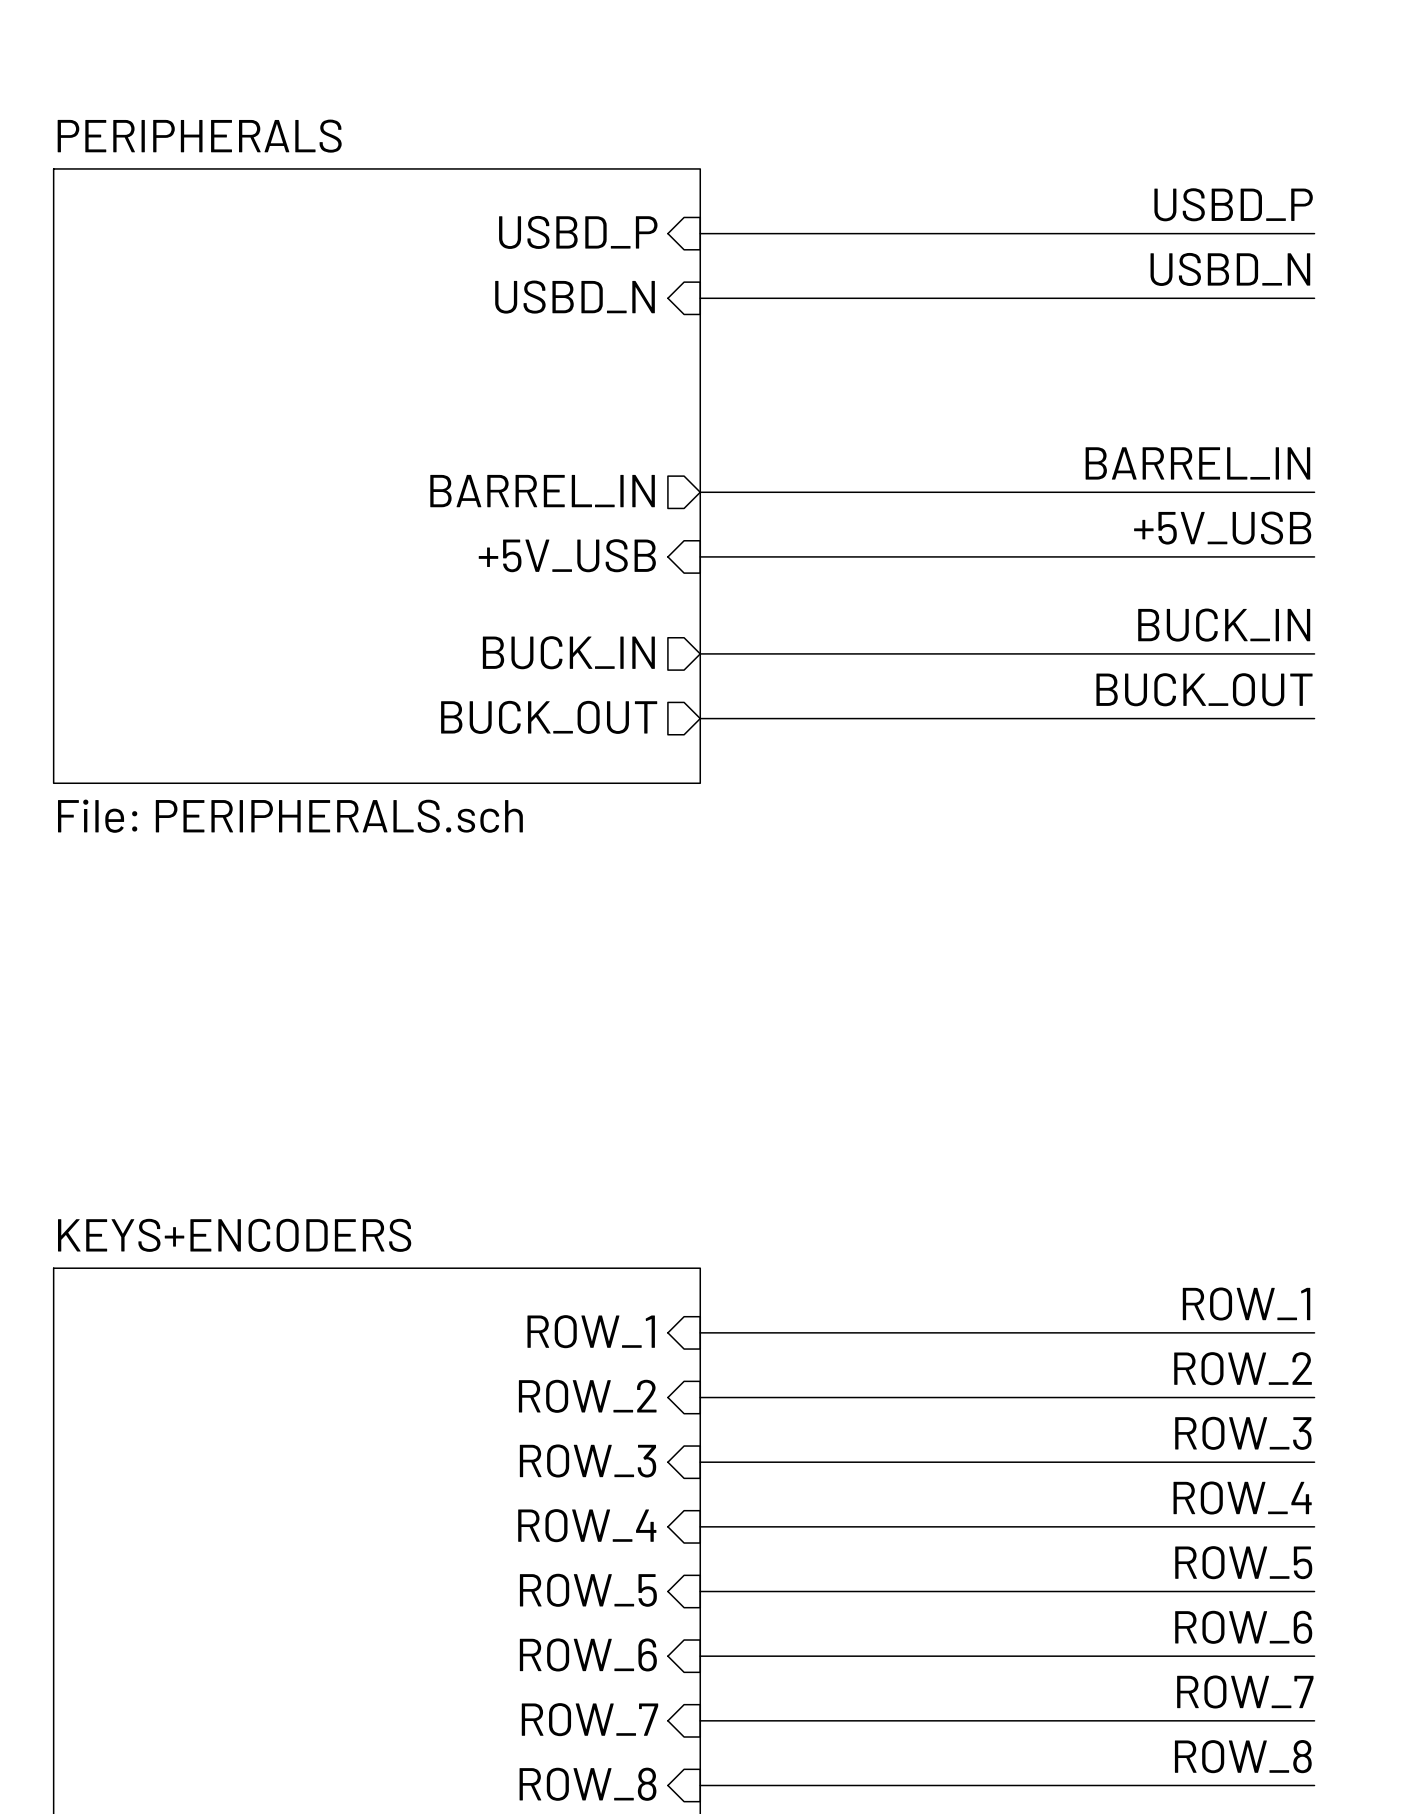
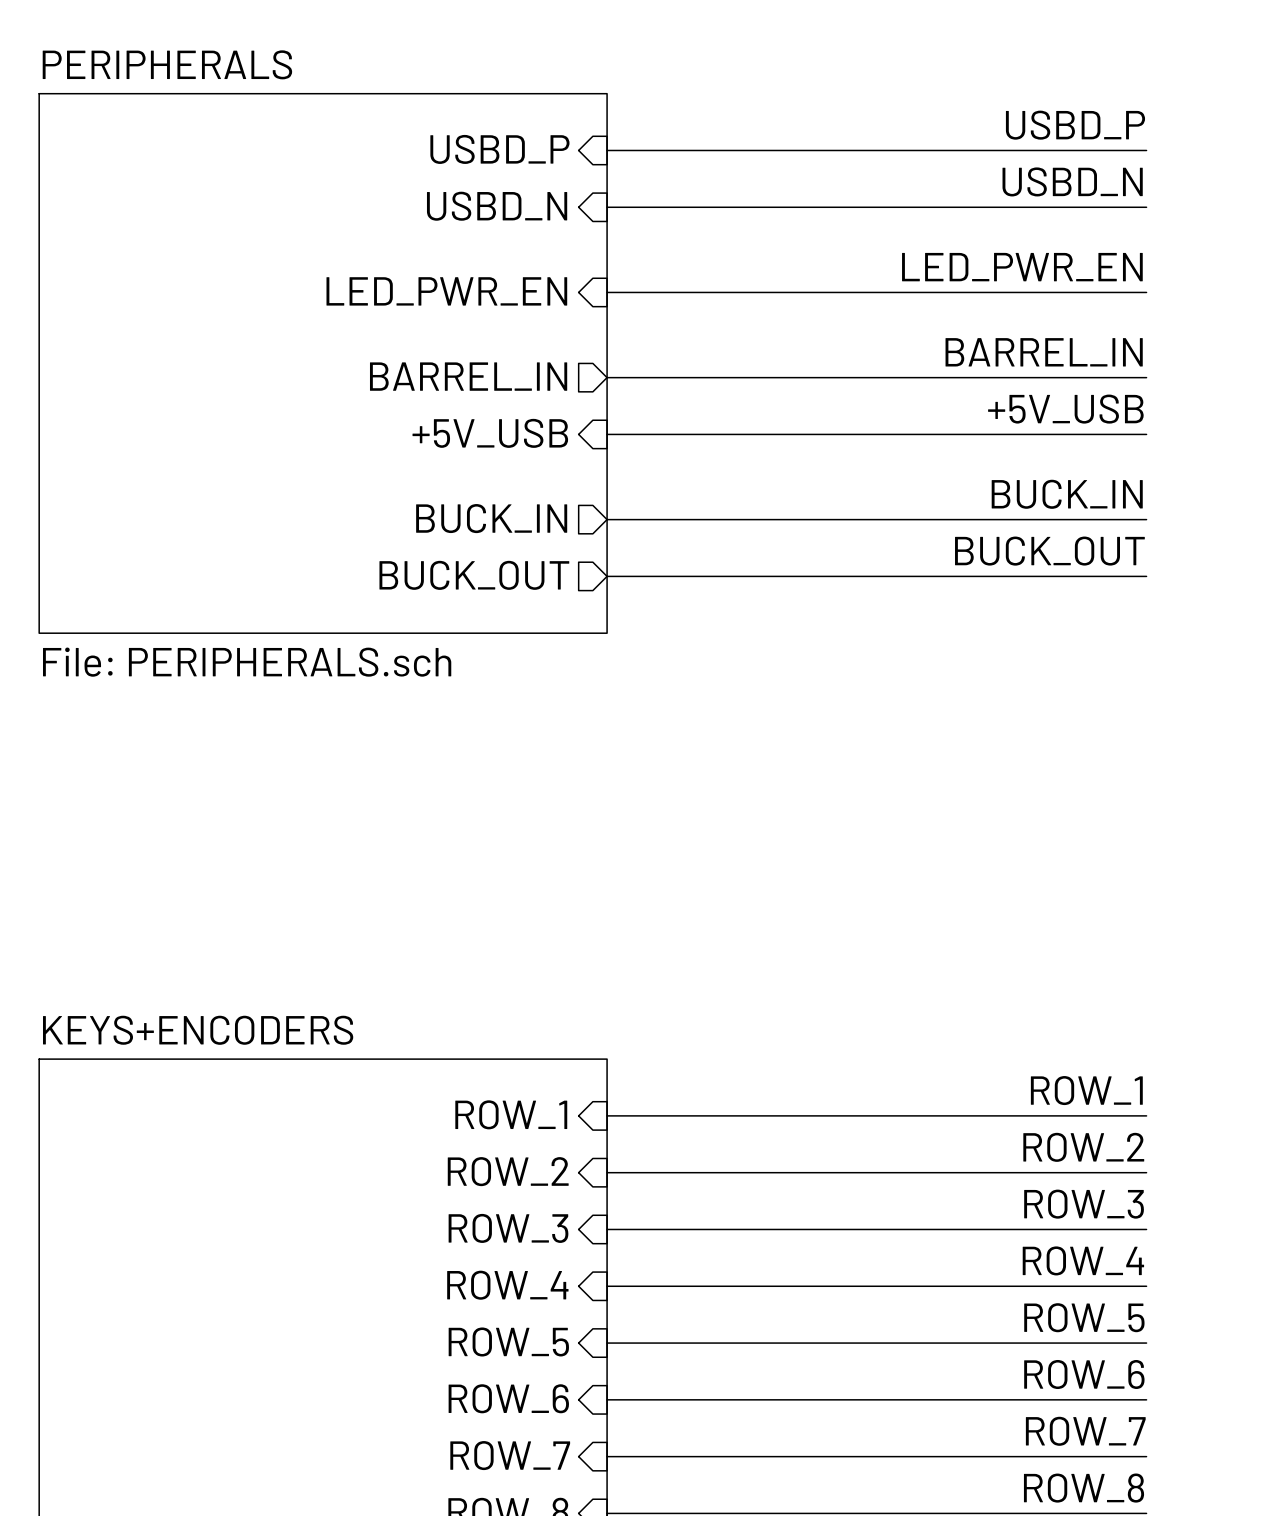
label: none -> LED_PWR_EN (1022, 267)
sheet pin: none -> LED_PWR_EN (446, 291)
wire: none -> (607, 292) (1146, 292)

